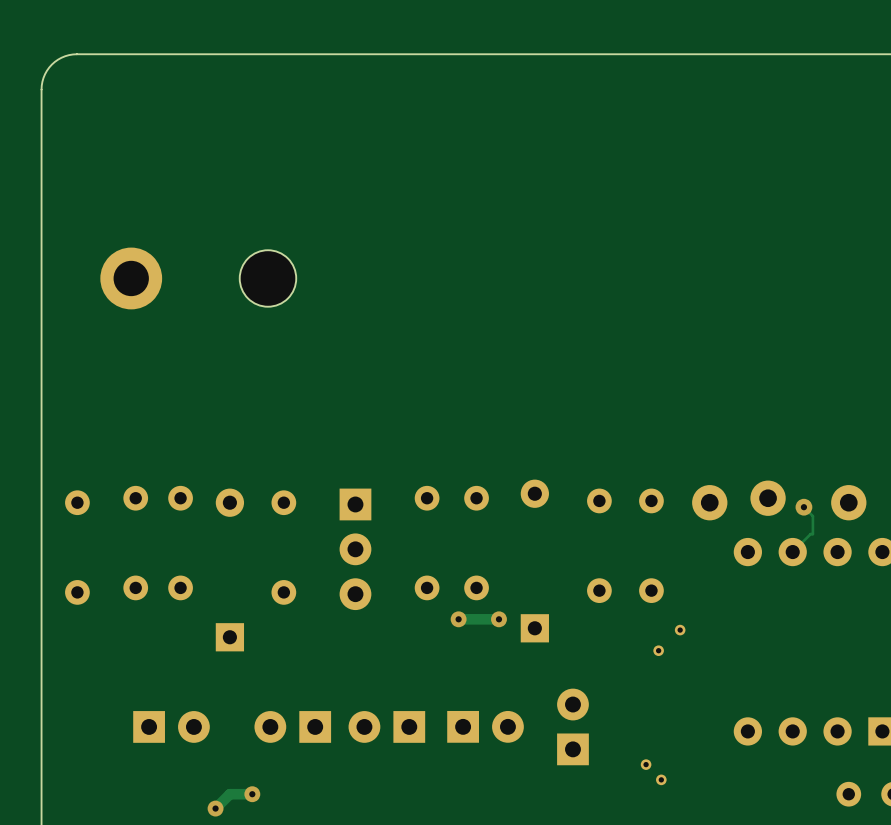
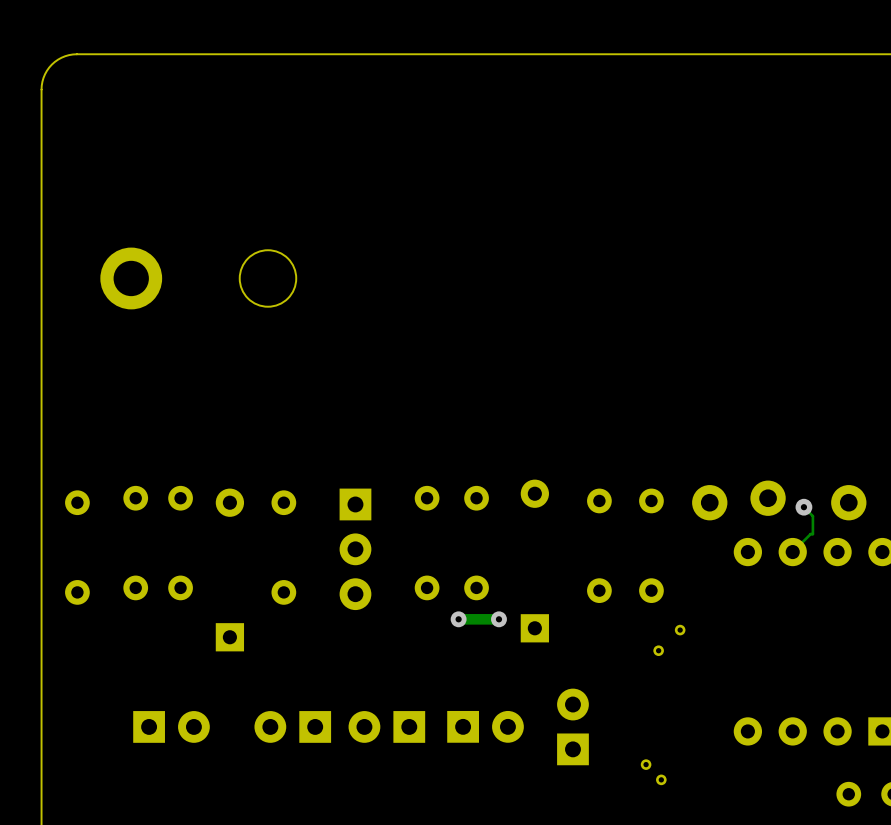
track: (252, 794) (229, 794) (215, 808) -> none
via: (252, 794) -> none
via: (215, 808) -> none

